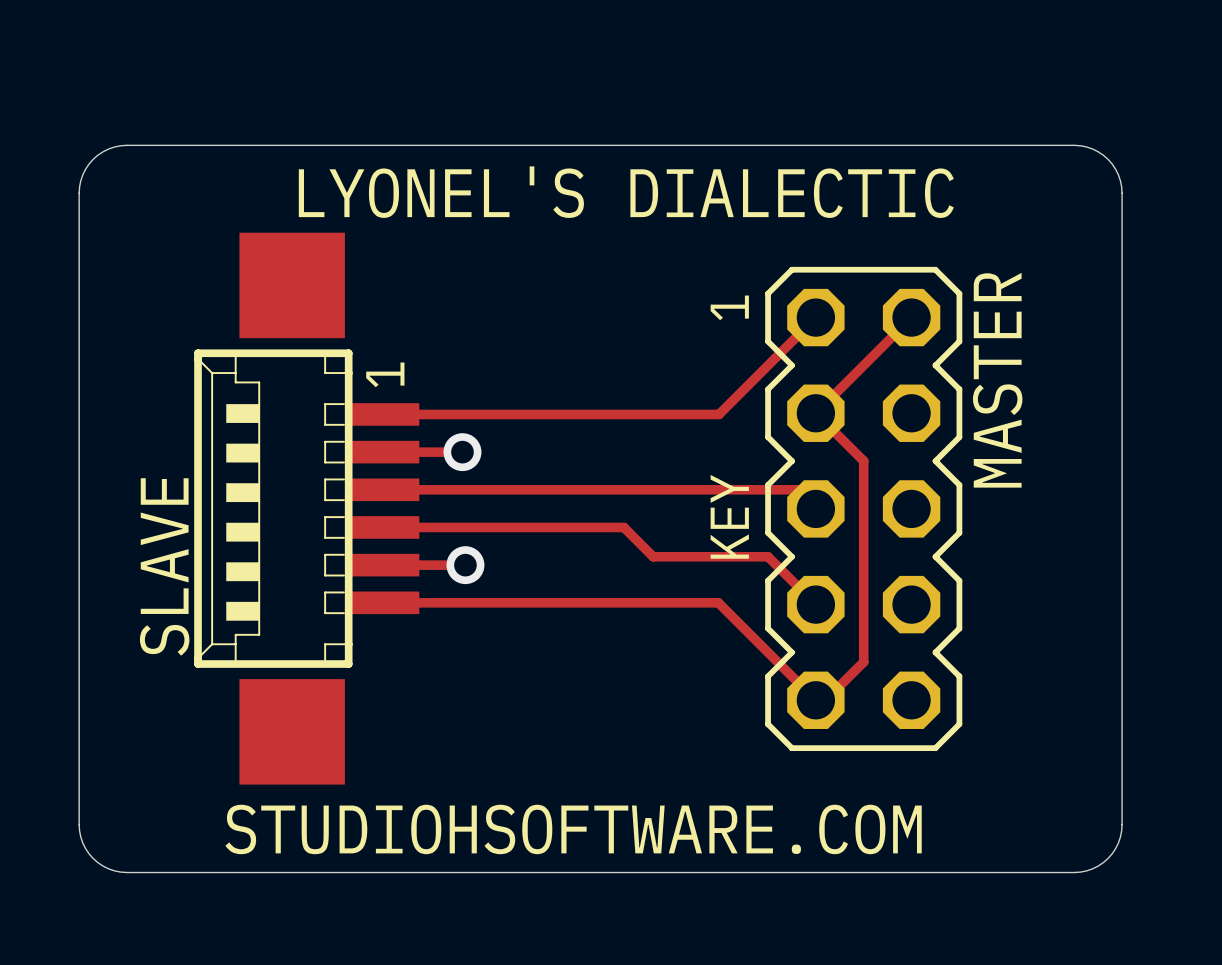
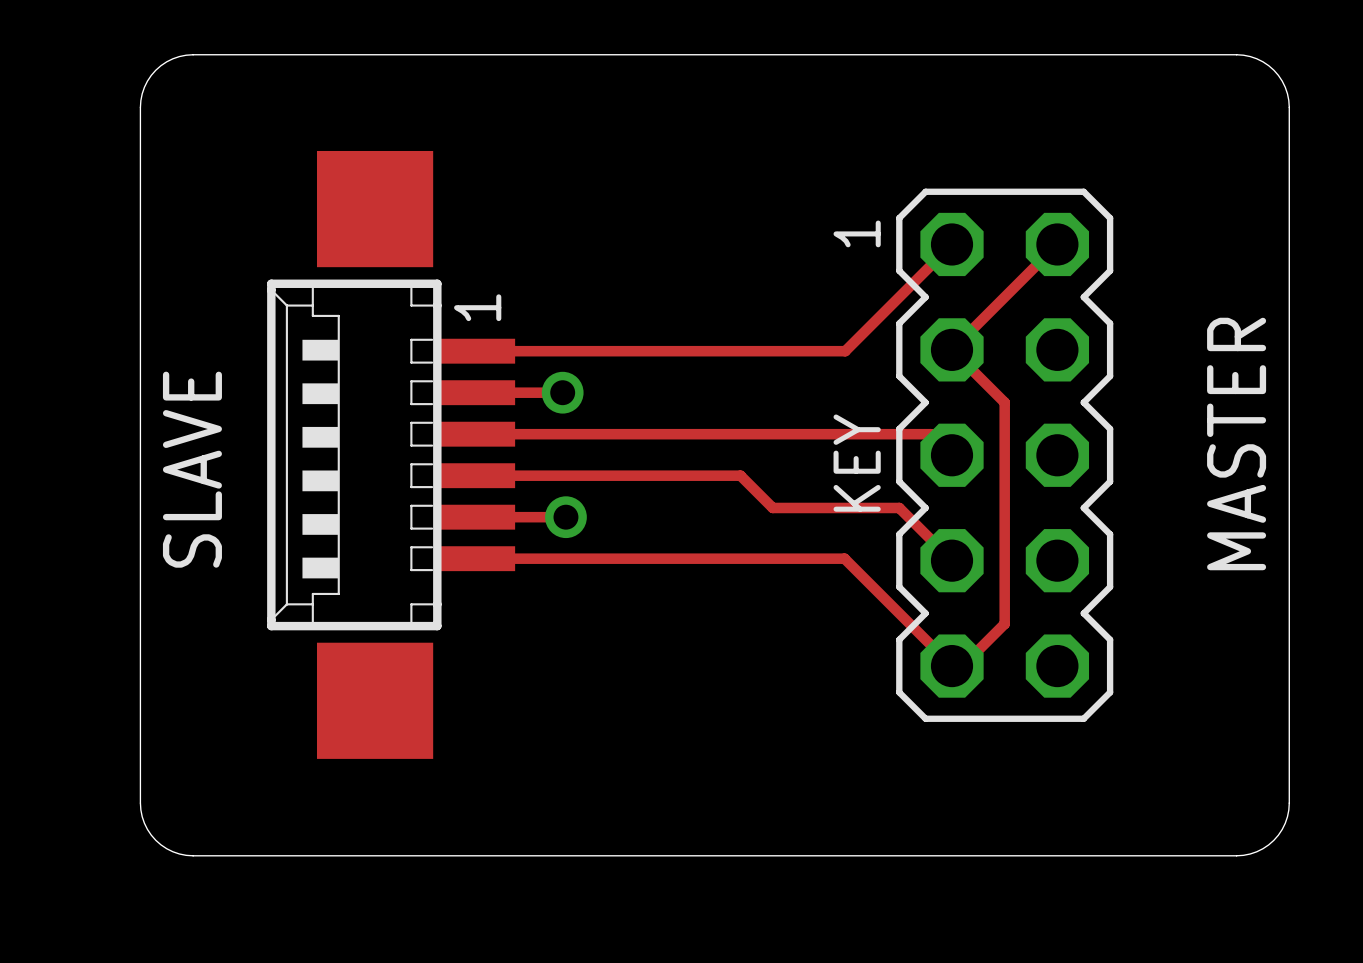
text: LYONEL'S DIALECTIC (626, 192) -> none
MASTER name position: MASTER (997, 380) -> MASTER (1236, 444)
SLAVE name position: SLAVE (164, 566) -> SLAVE (192, 469)
text: STUDIOHSOFTWARE.COM (573, 829) -> none

